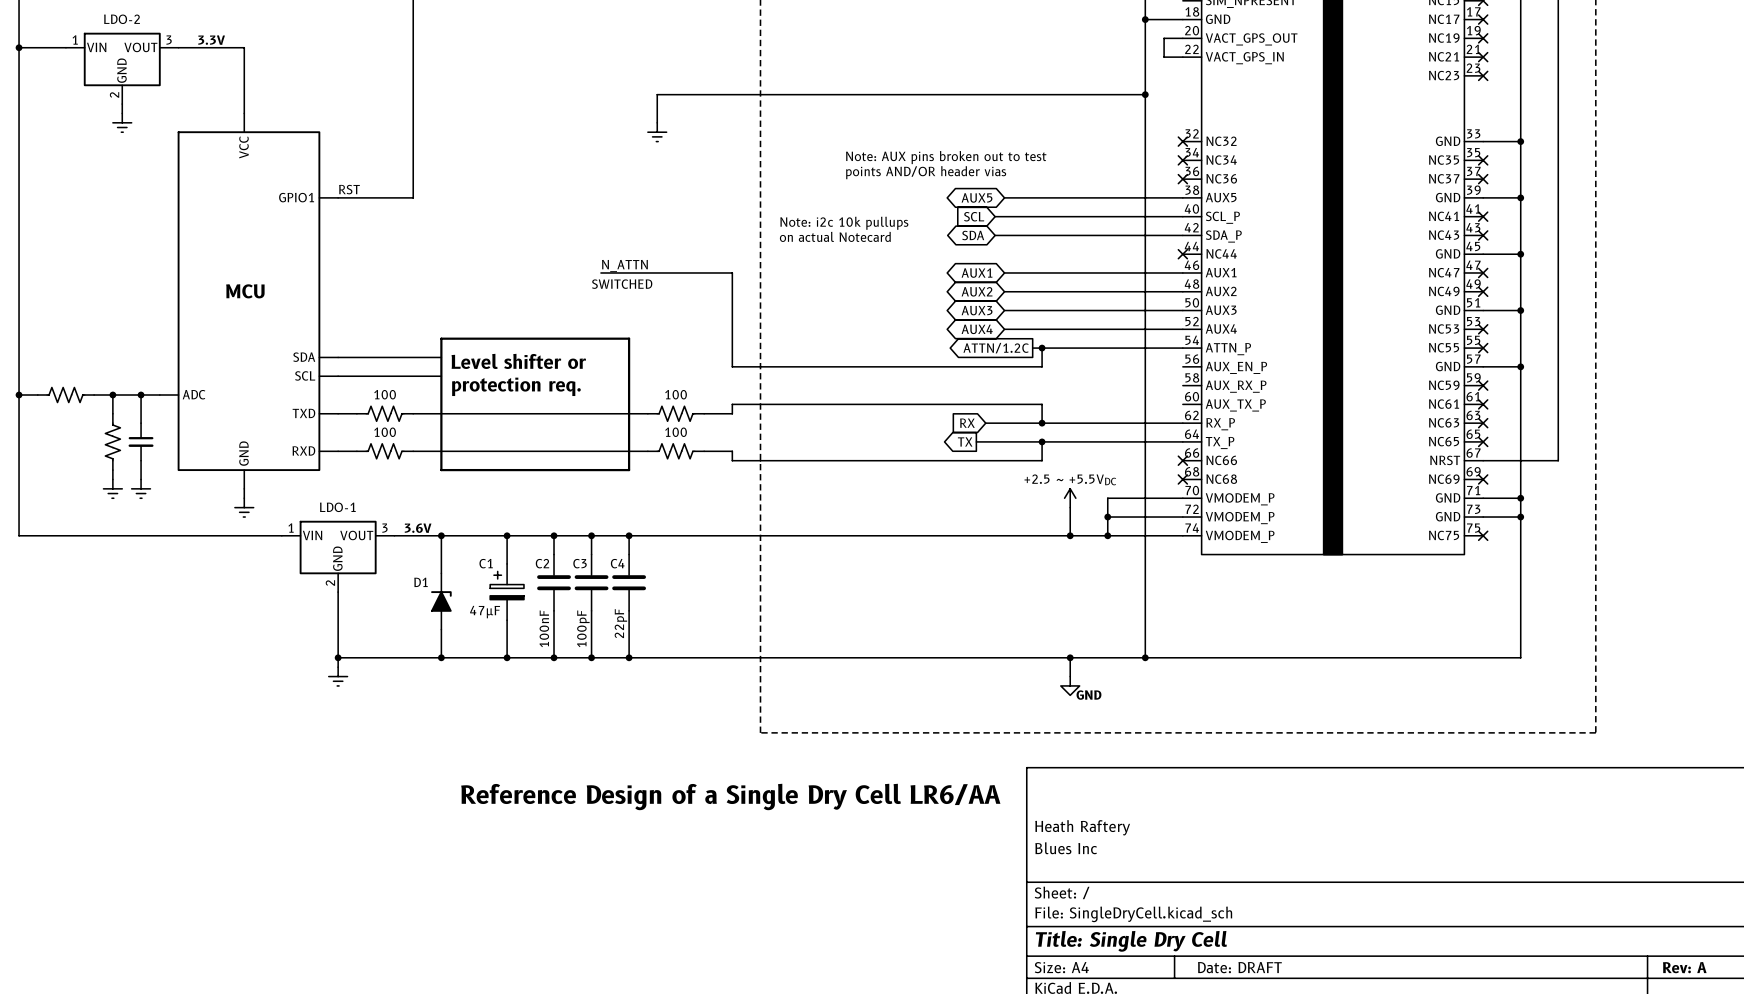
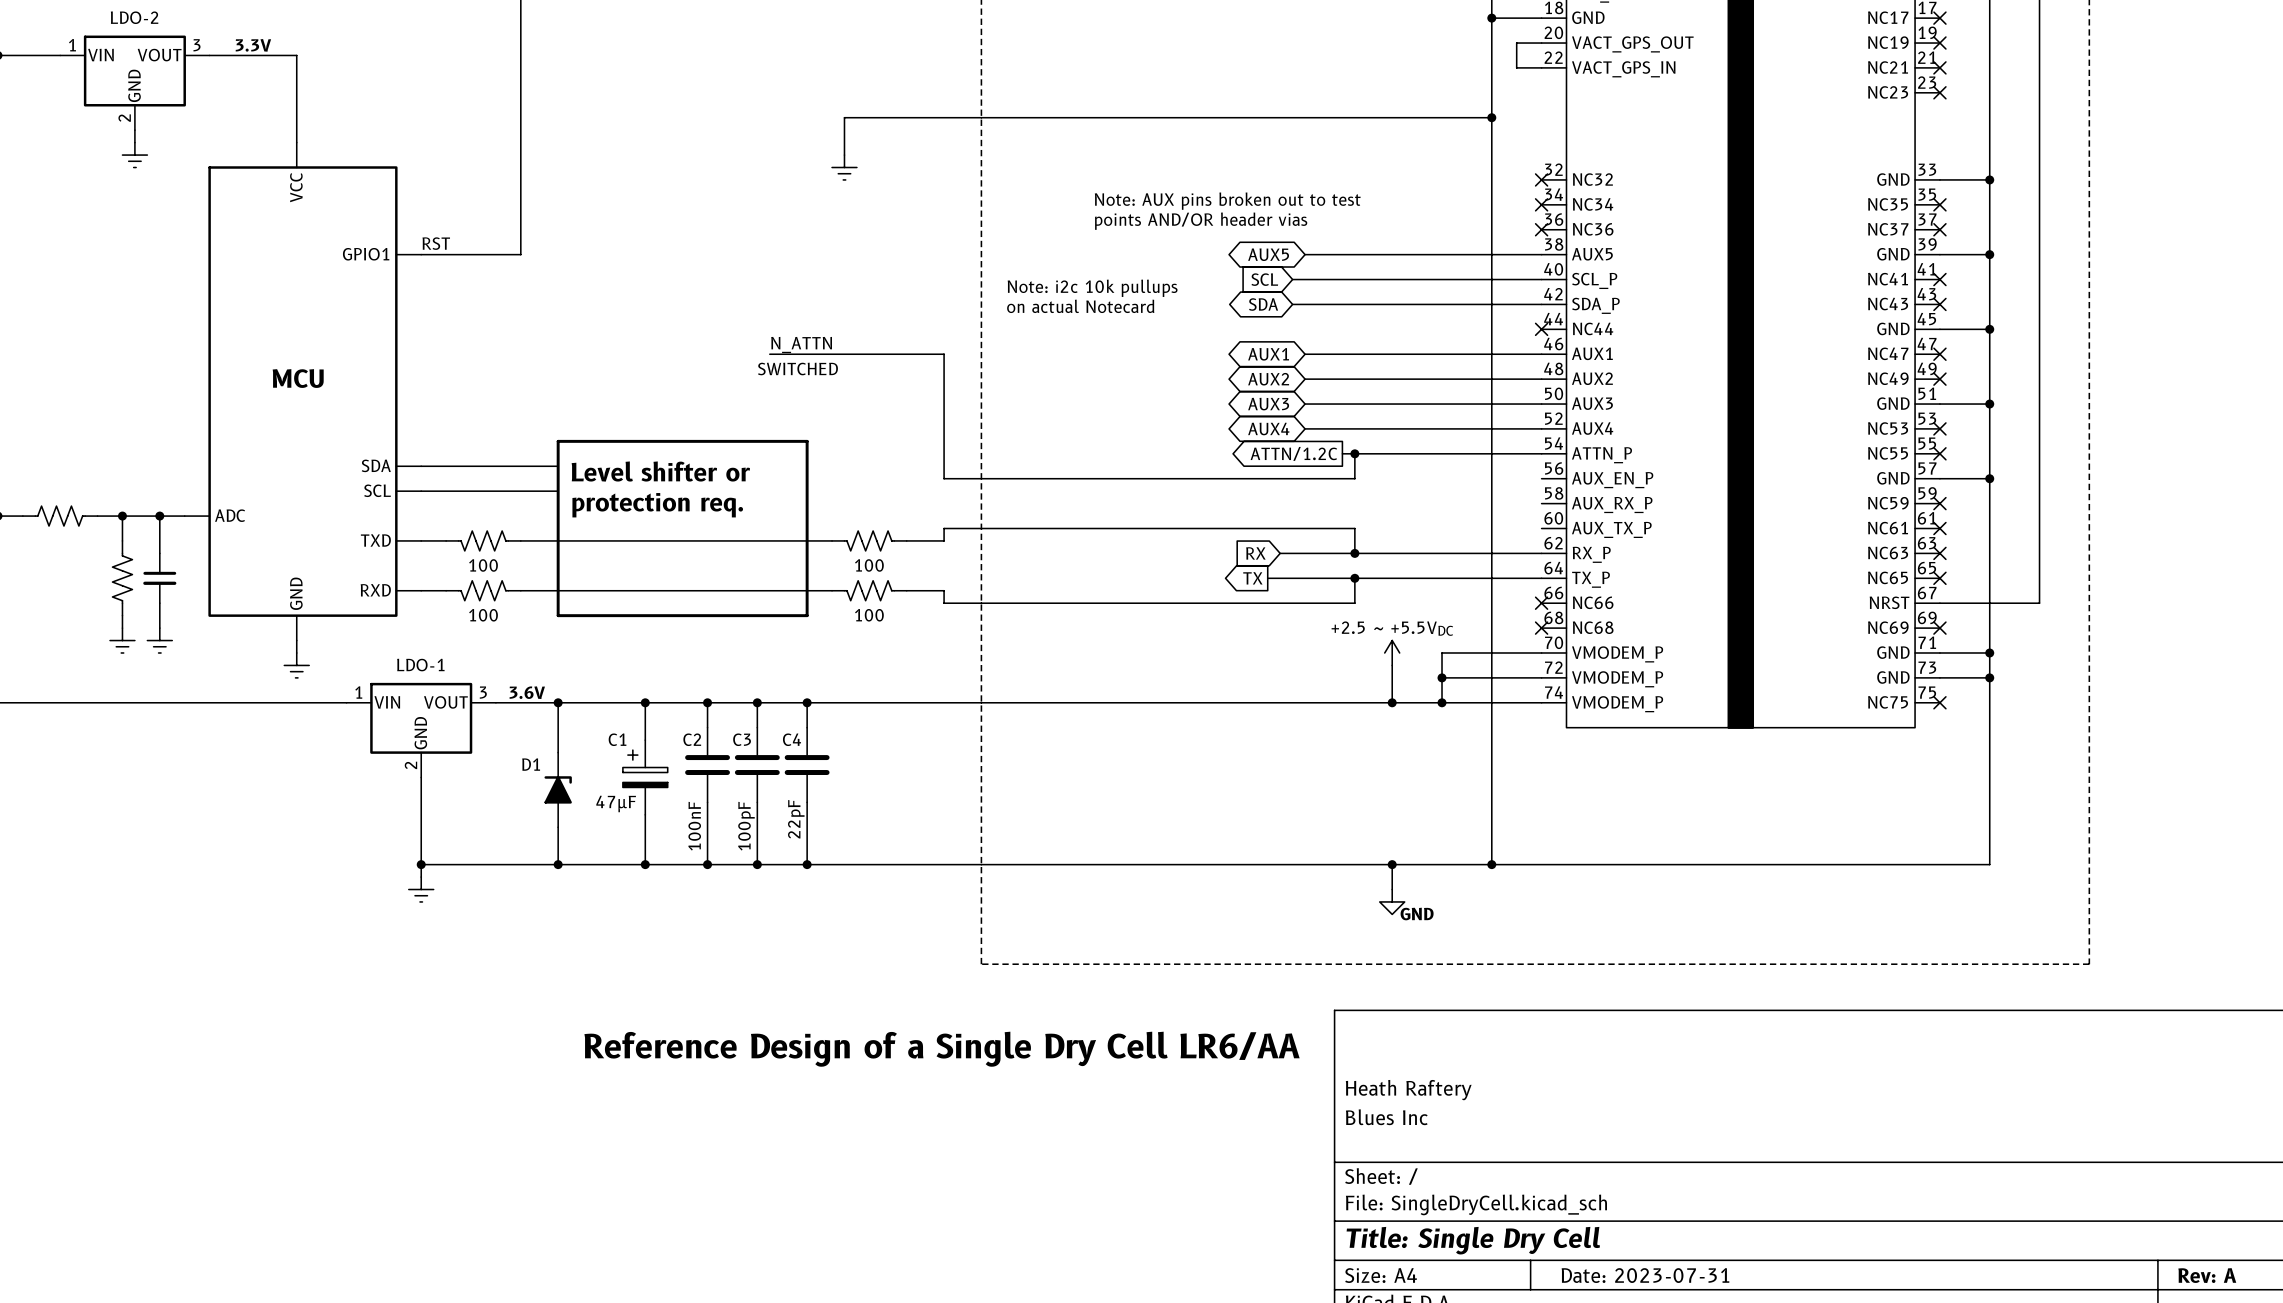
part value position: 100 (385, 394) -> 100 (483, 565)
part value position: 100 (676, 394) -> 100 (869, 565)
part flip: as is (385, 413) -> left-right (483, 540)
part flip: as is (676, 413) -> left-right (869, 540)
part value position: 100 (385, 432) -> 100 (483, 615)
part value position: 100 (676, 432) -> 100 (869, 615)
part flip: as is (385, 451) -> left-right (483, 590)
part flip: as is (676, 451) -> left-right (869, 590)
title block: Date: DRAFT (1239, 967) -> Date: 2023-07-31 (1645, 1275)

